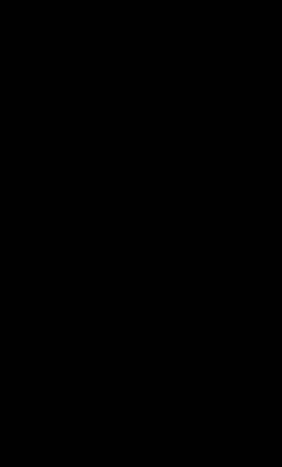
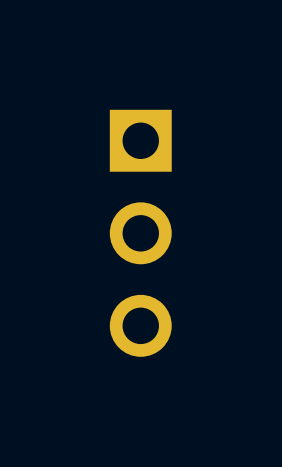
part: none -> (140, 233)

